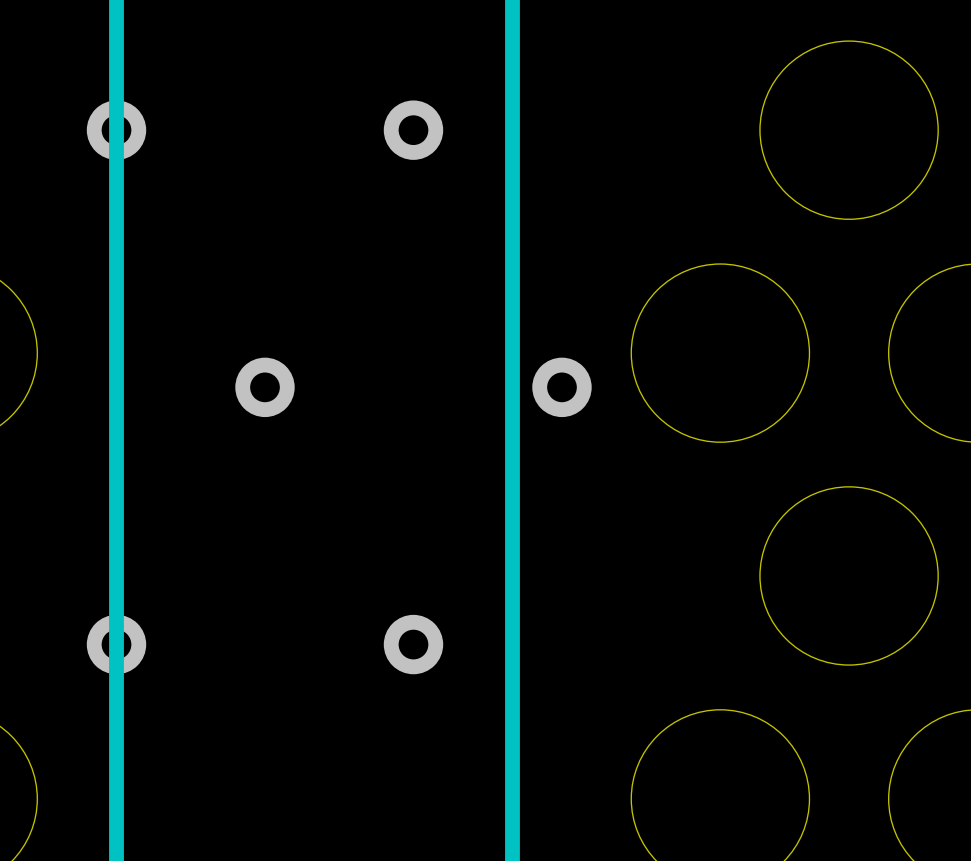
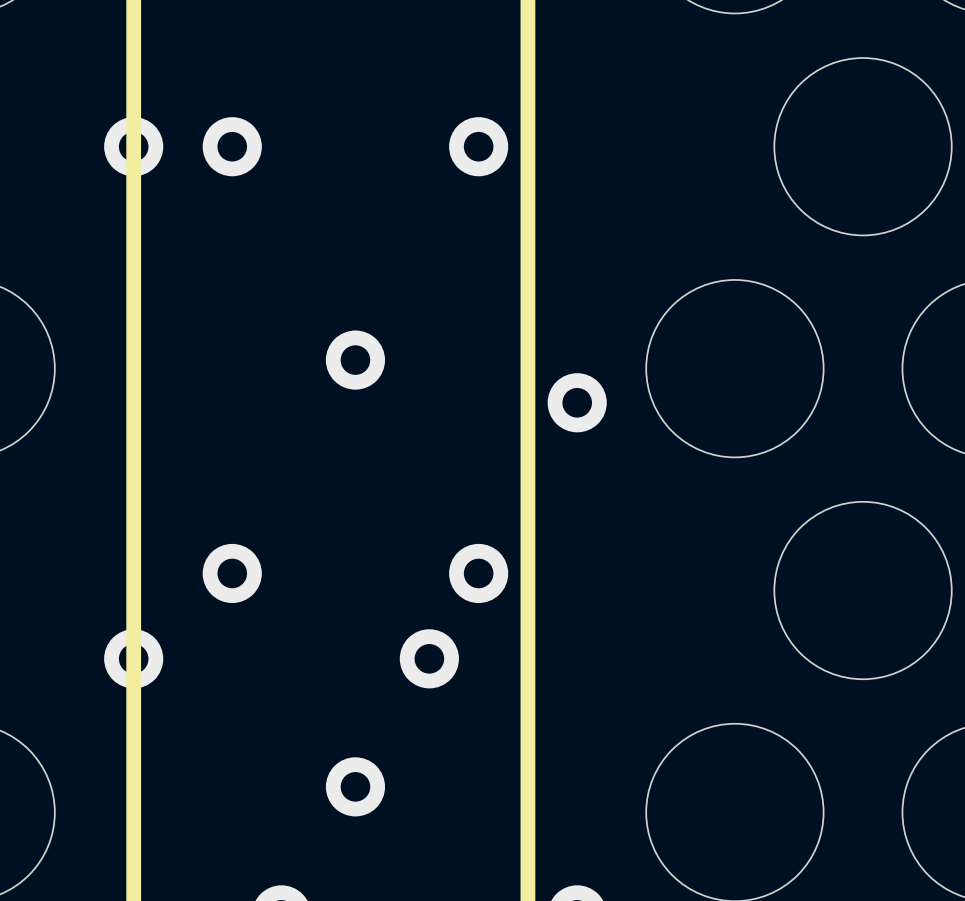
via: none -> (232, 146)
via position: (413, 130) -> (478, 146)
via position: (264, 387) -> (355, 360)
via: none -> (232, 573)
via: none -> (478, 573)
via: none -> (355, 786)

